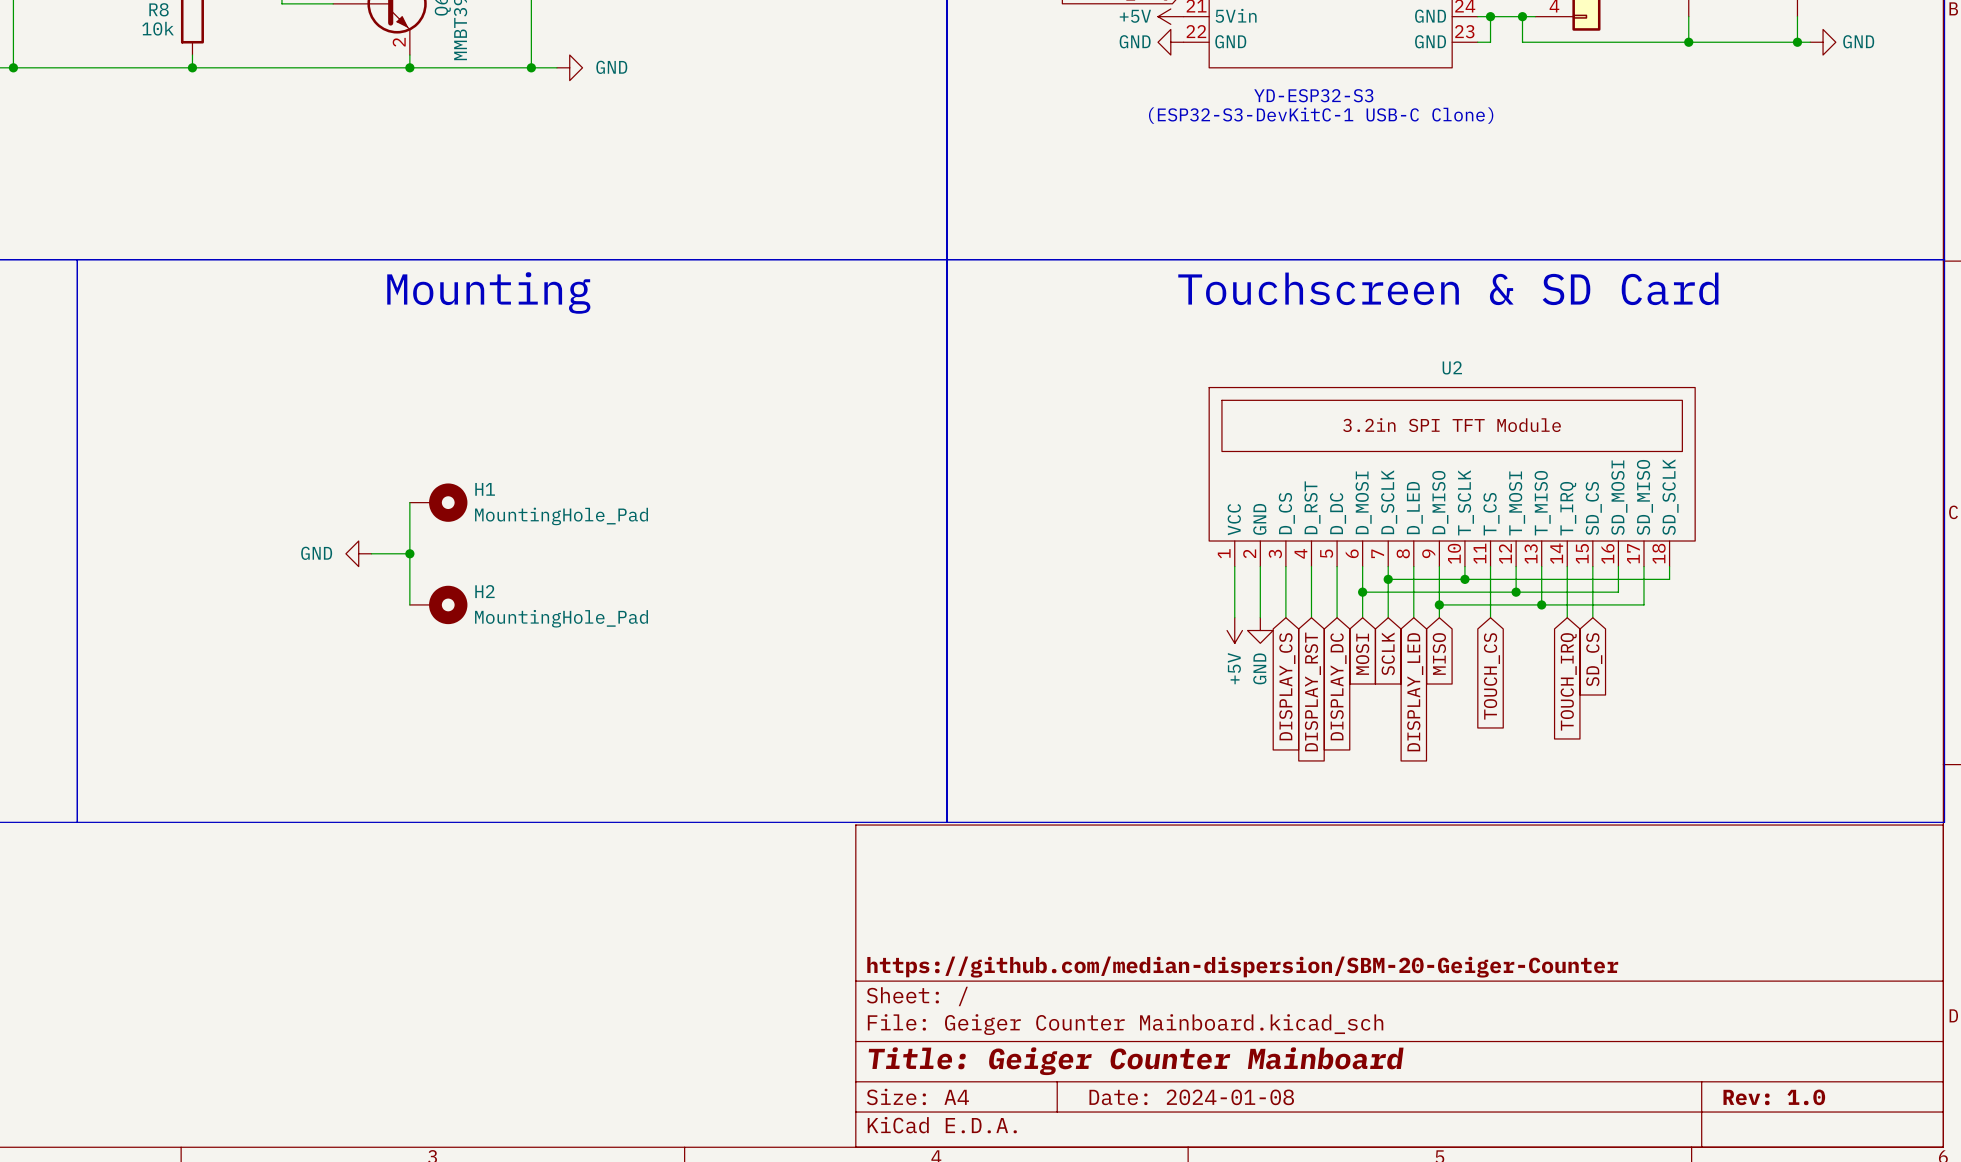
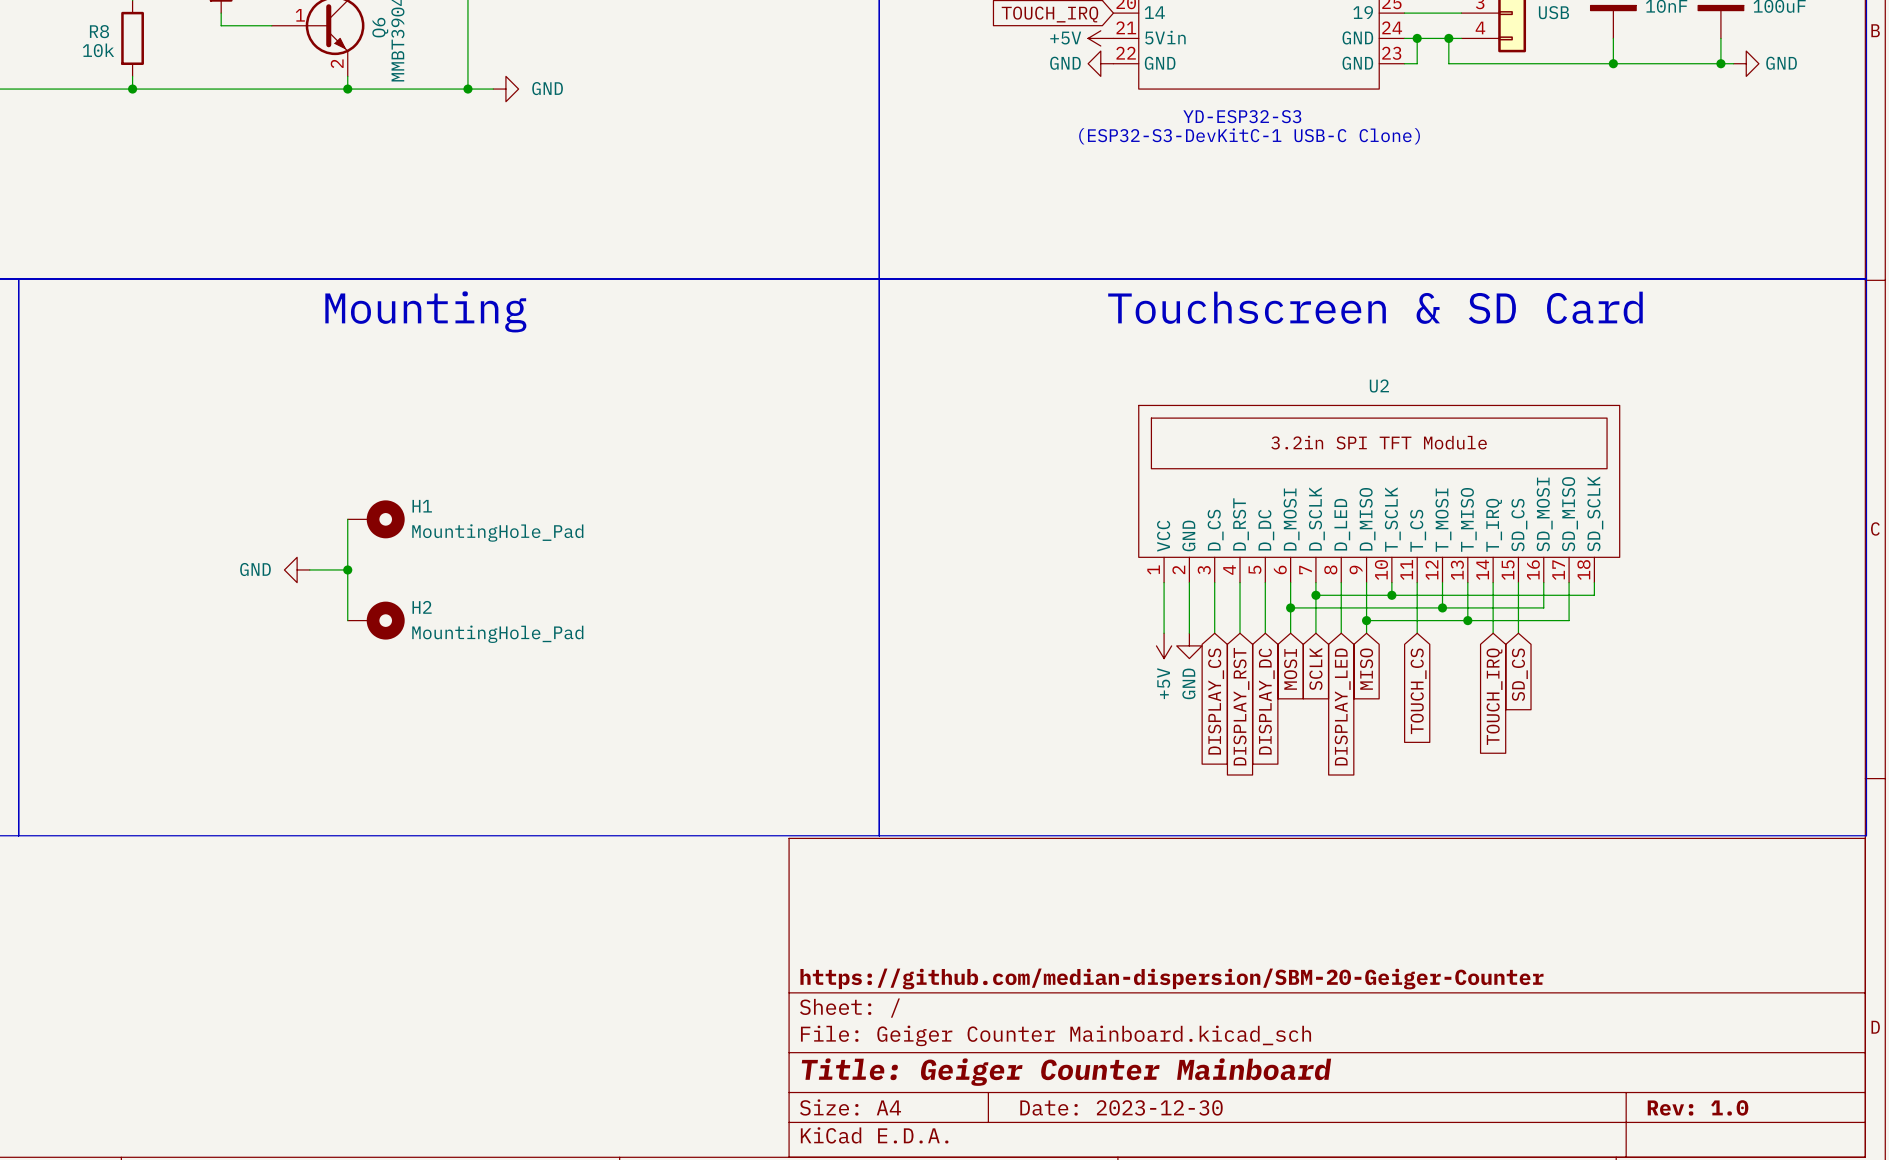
title block: Date: 2024-01-08 (1191, 1097) -> Date: 2023-12-30 (1121, 1107)

